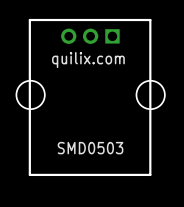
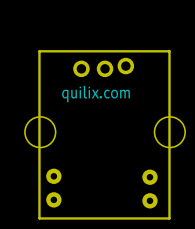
part footprint: [105, 29, 120, 44] -> [117, 57, 135, 75]
part: none -> (53, 188)
part: none -> (149, 189)
text: SMD0503 (90, 148) -> none

